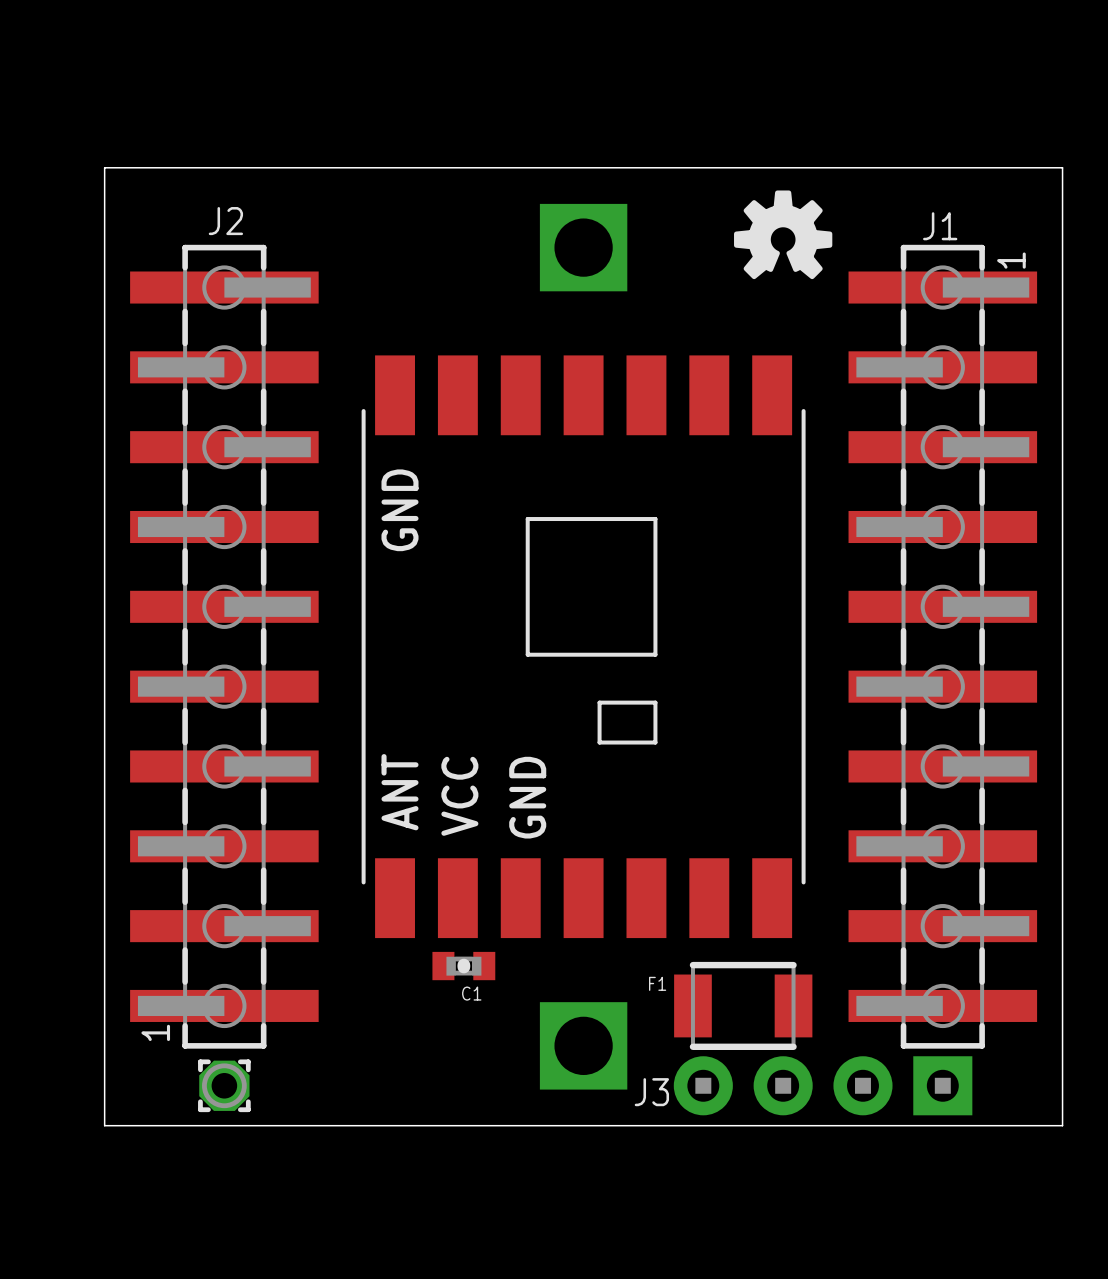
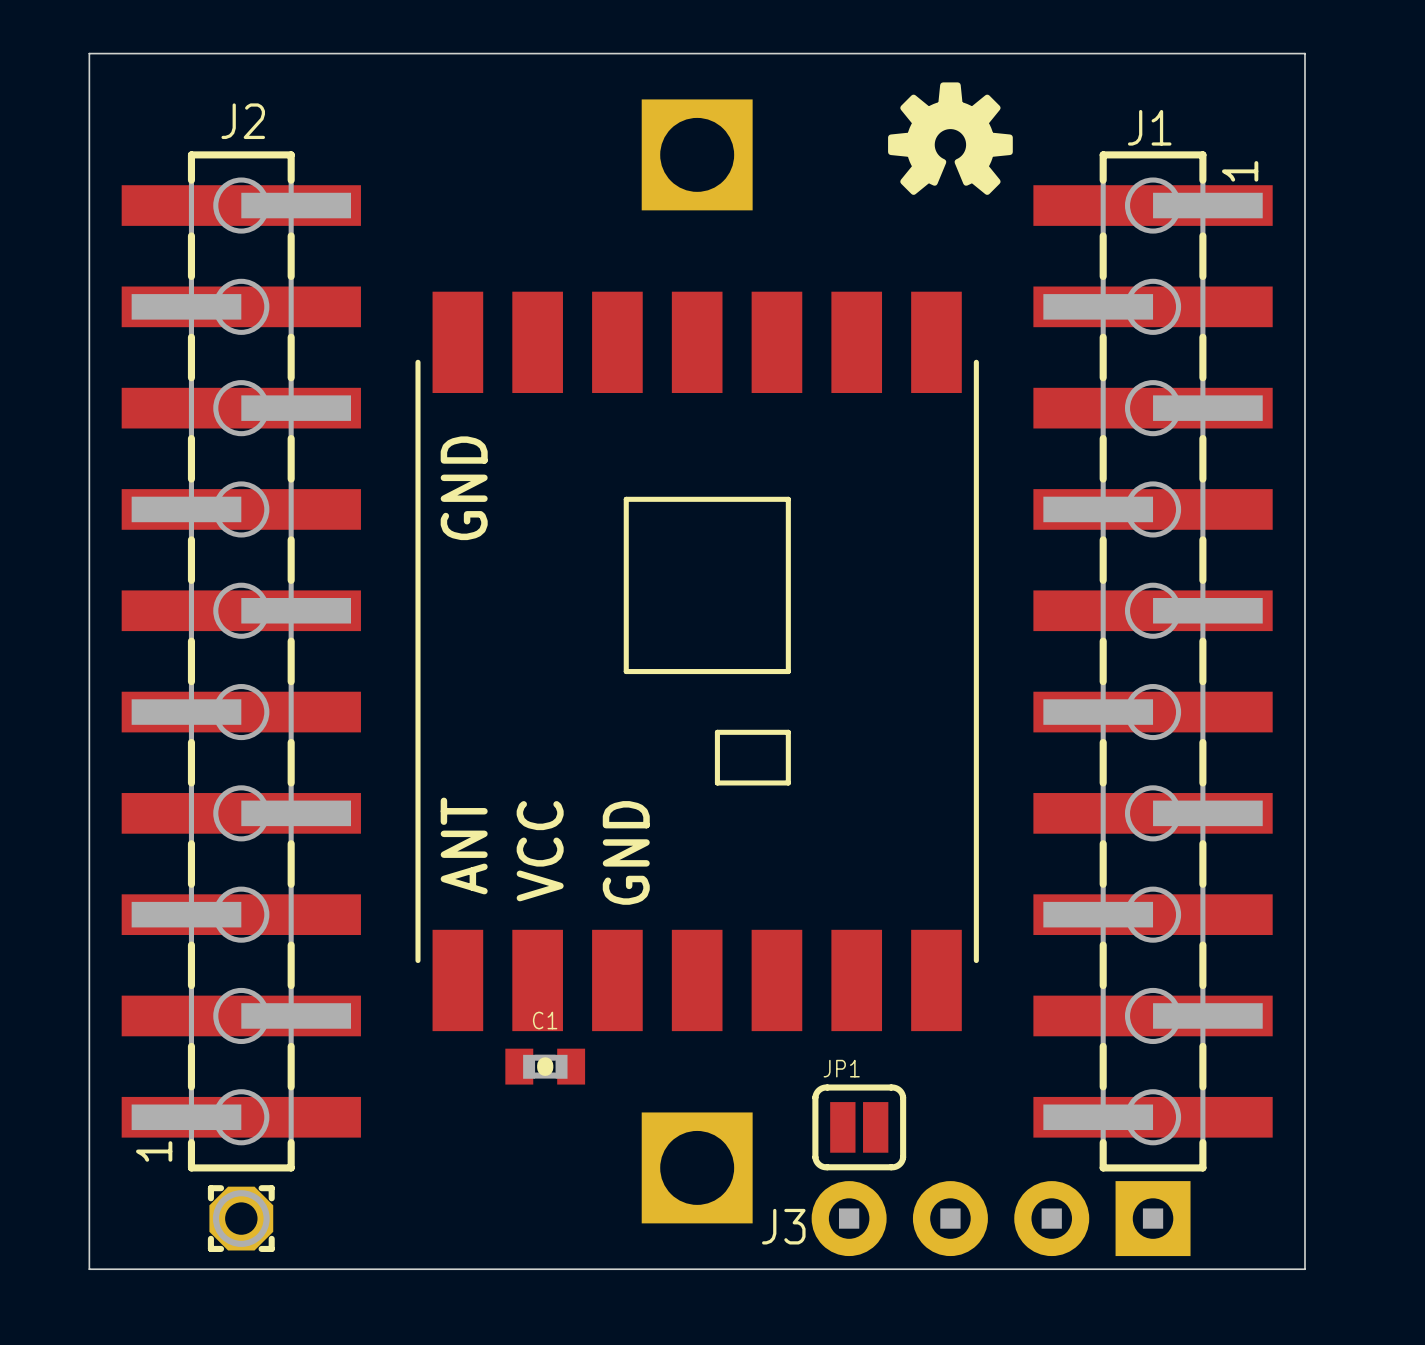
C1 name position: C1 (471, 993) -> C1 (545, 1020)
F1: (743, 1005) -> none
JP1: none -> (859, 1127)

